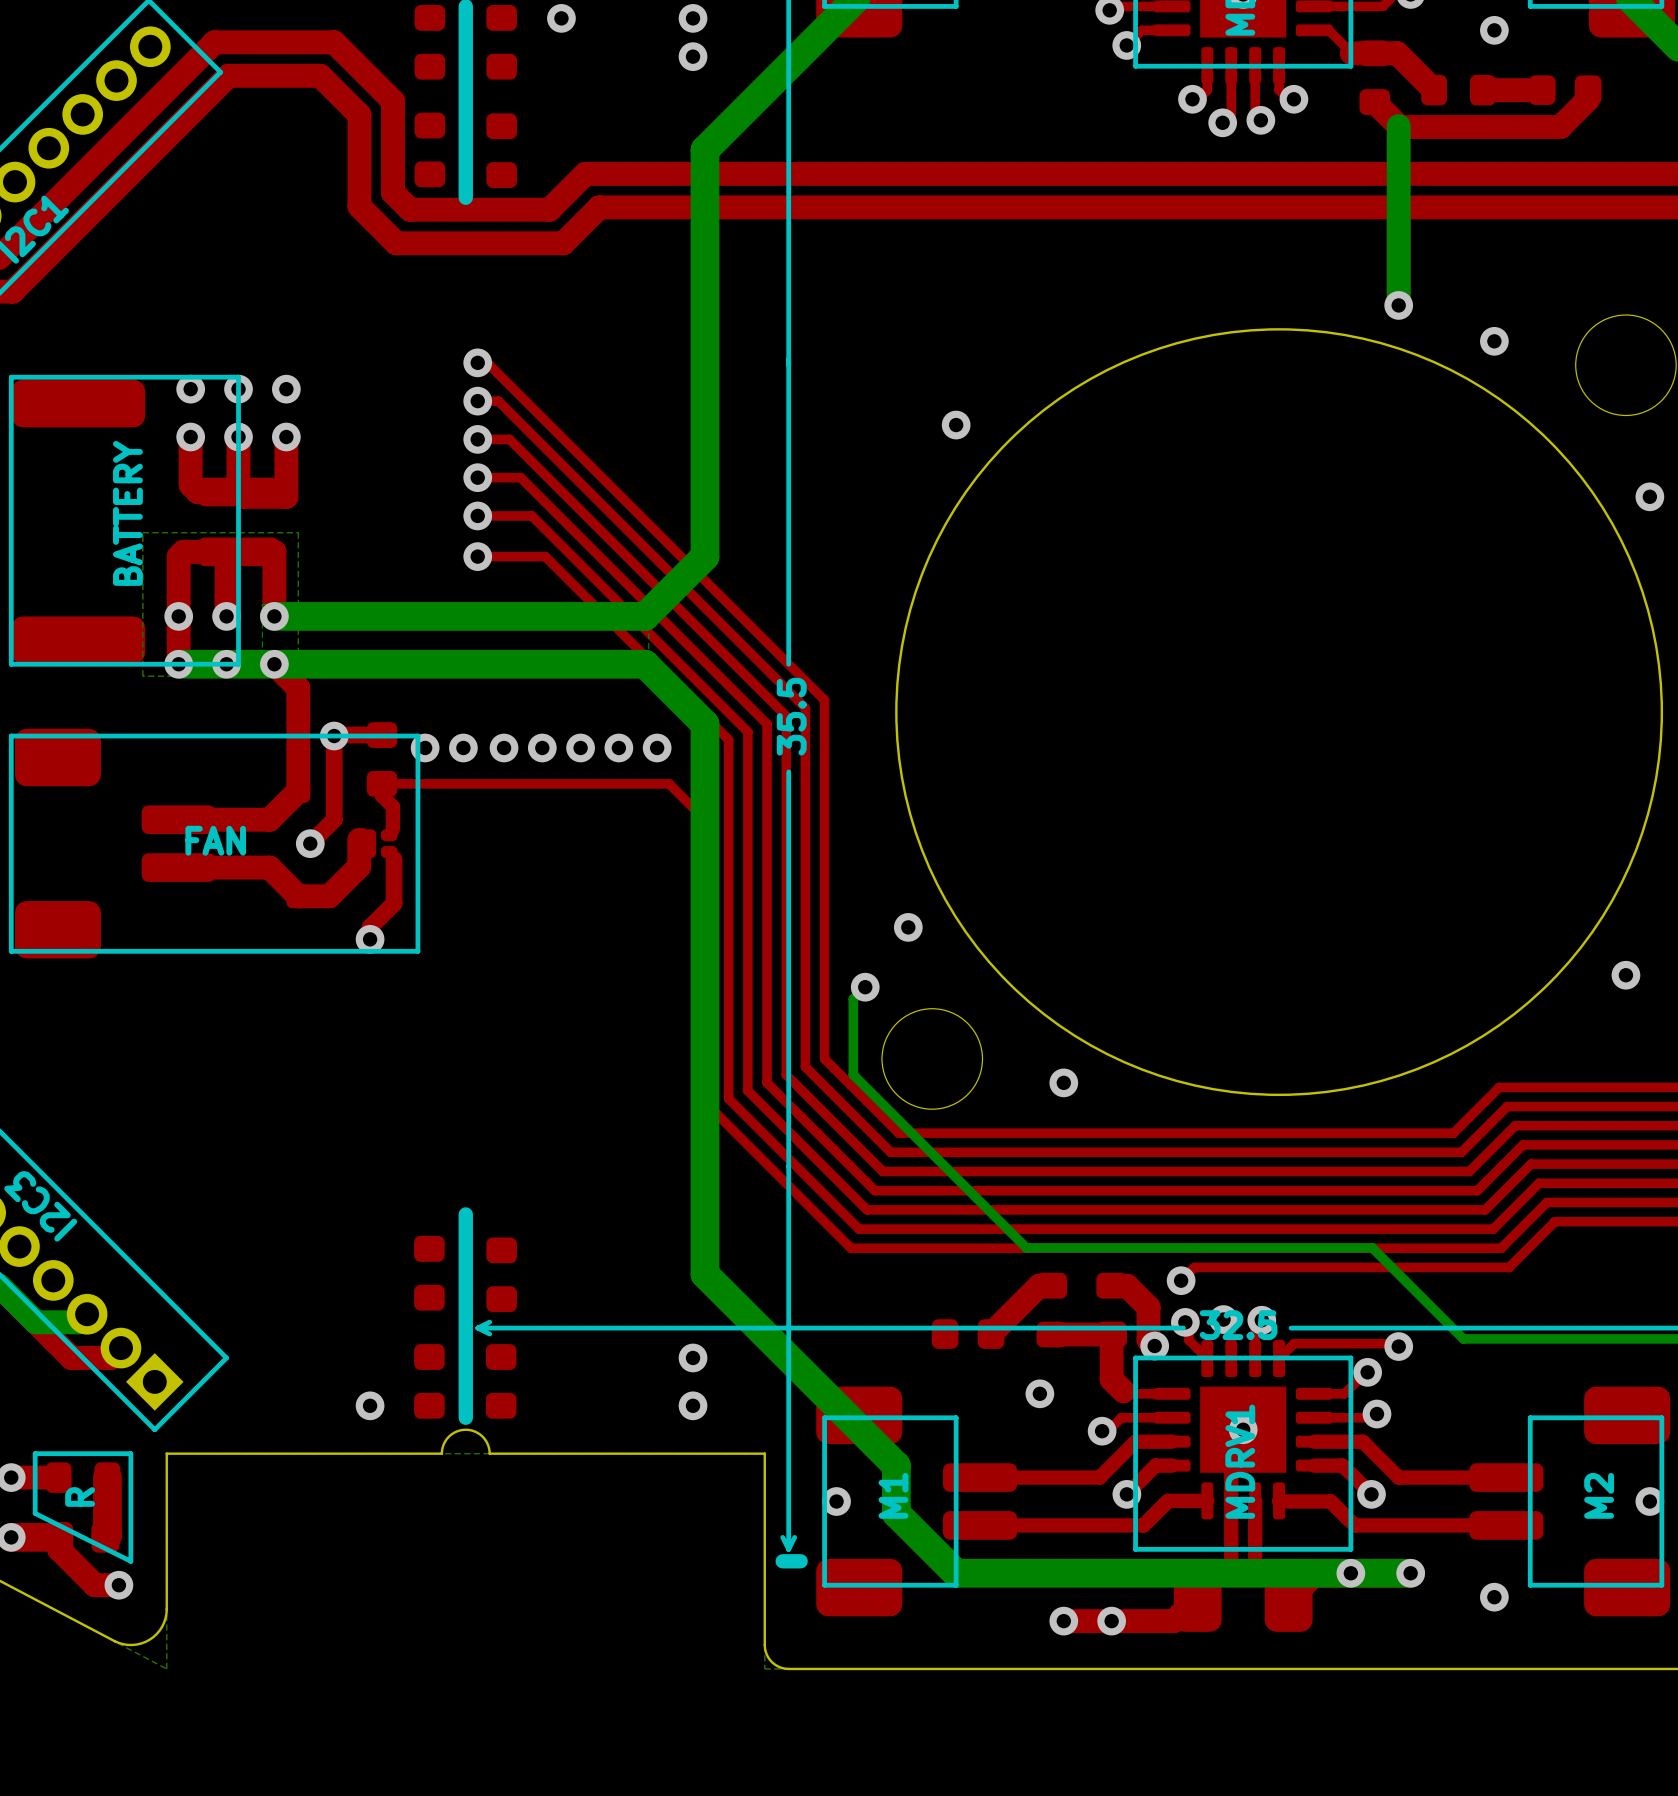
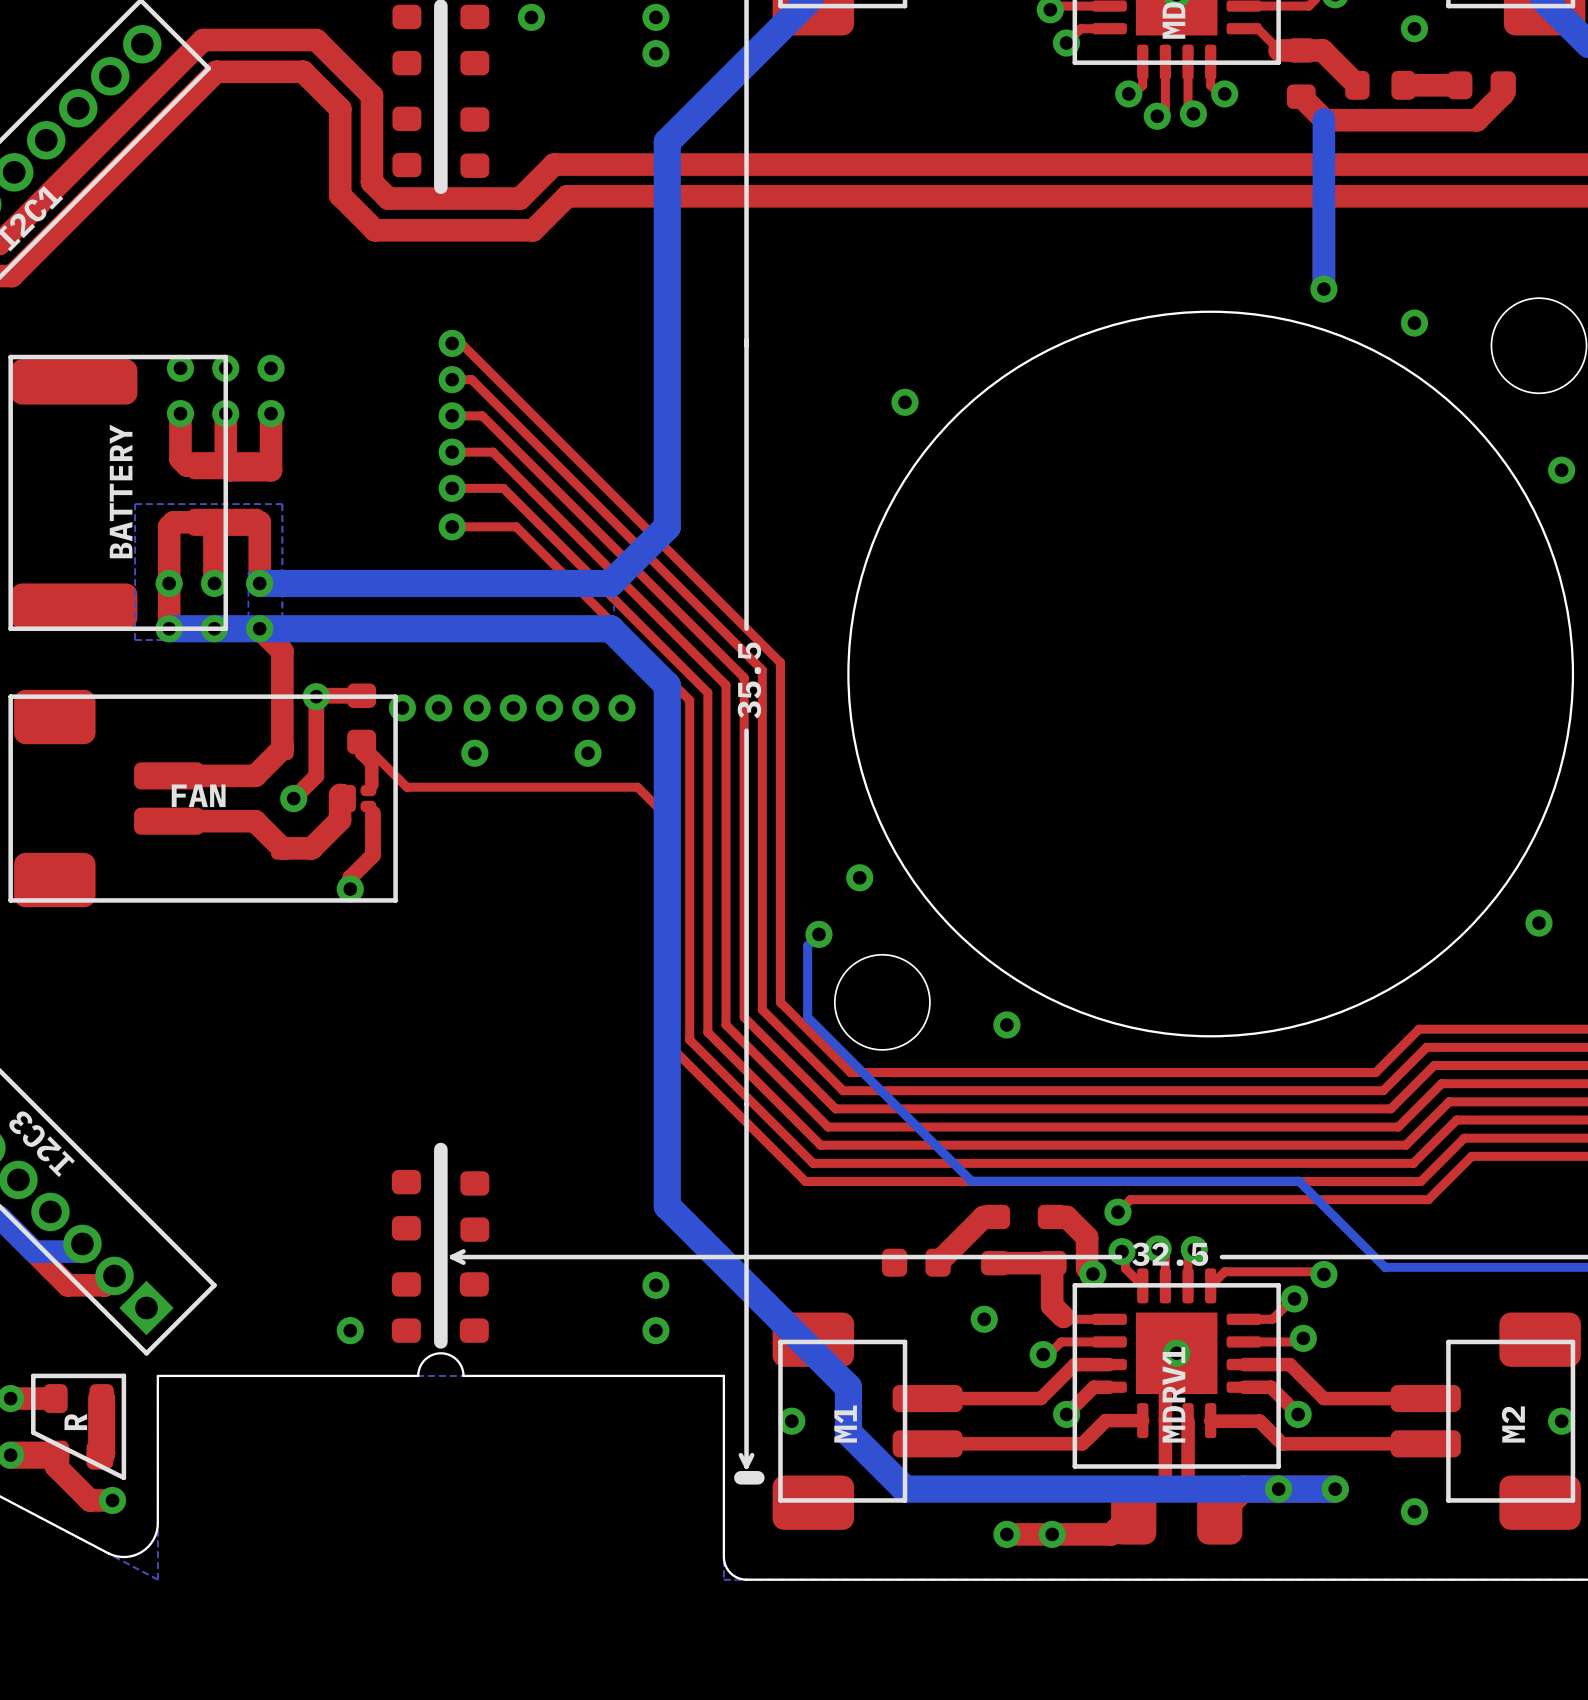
top track: (382, 783) (669, 783) (709, 824) (709, 867) -> (361, 741) (406, 787) (637, 787) (671, 821)
via: none -> (474, 753)
via: none -> (588, 753)

